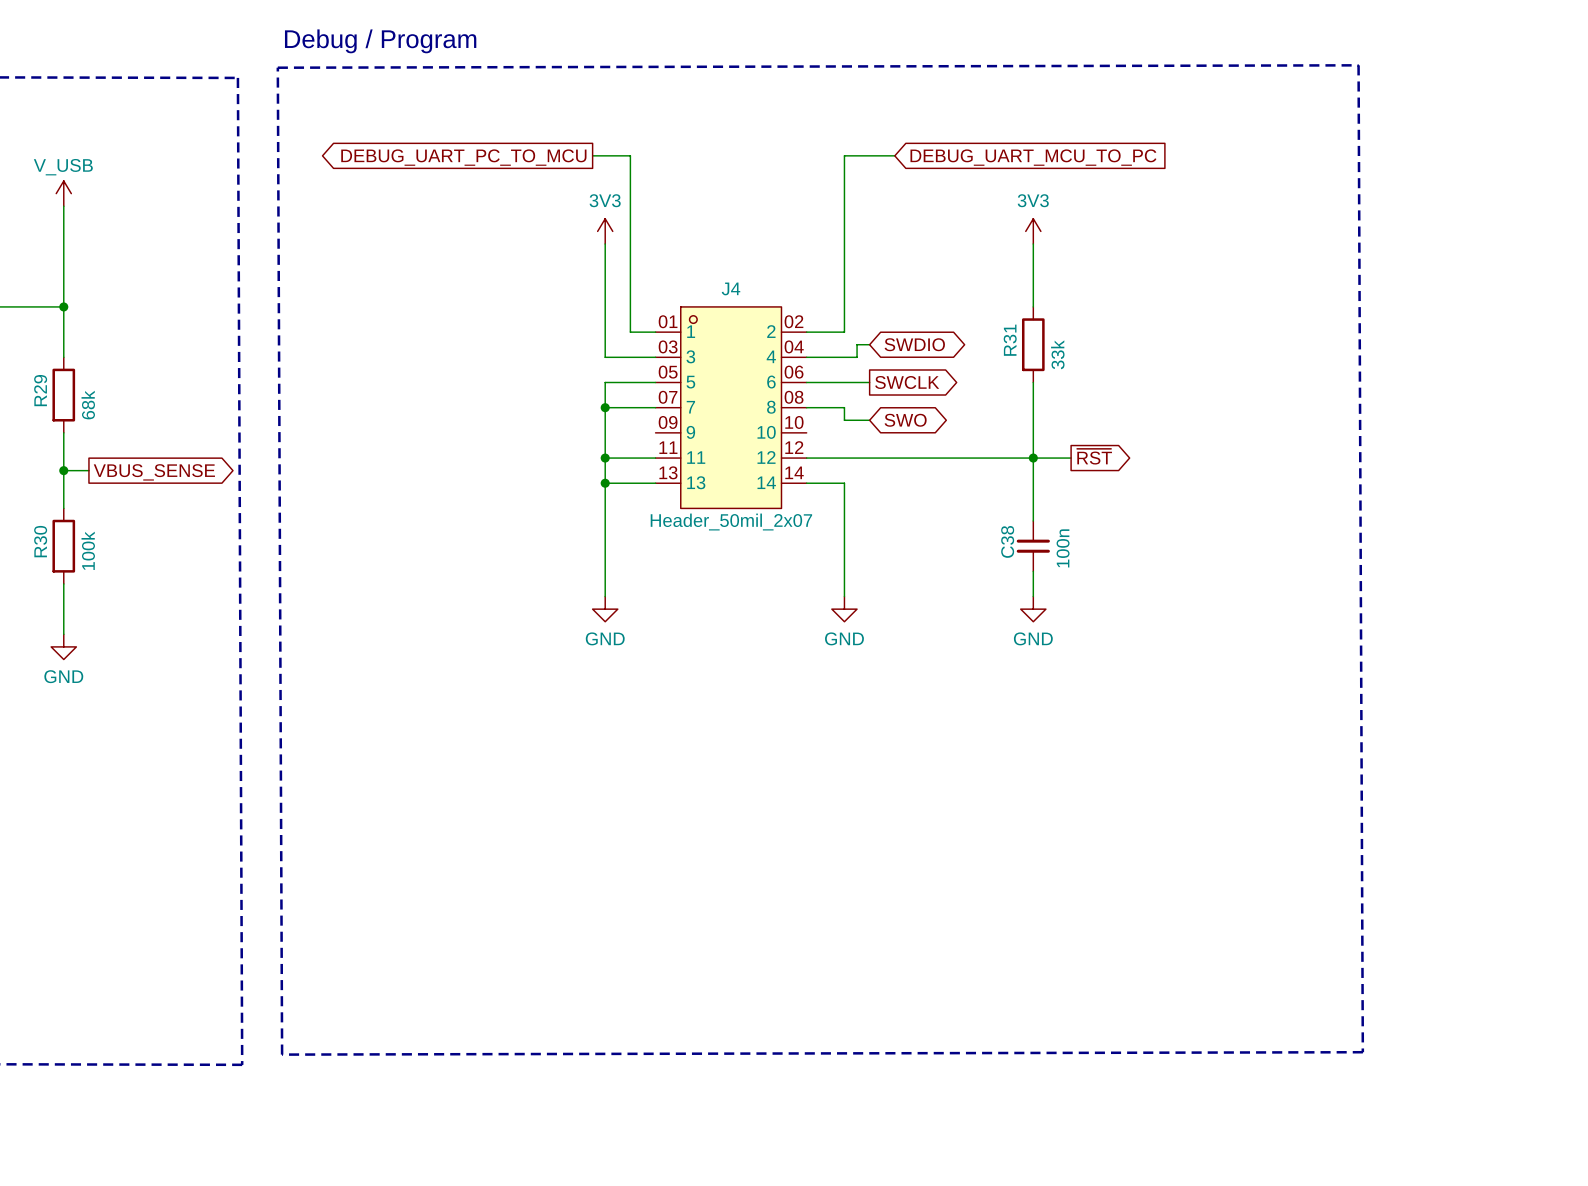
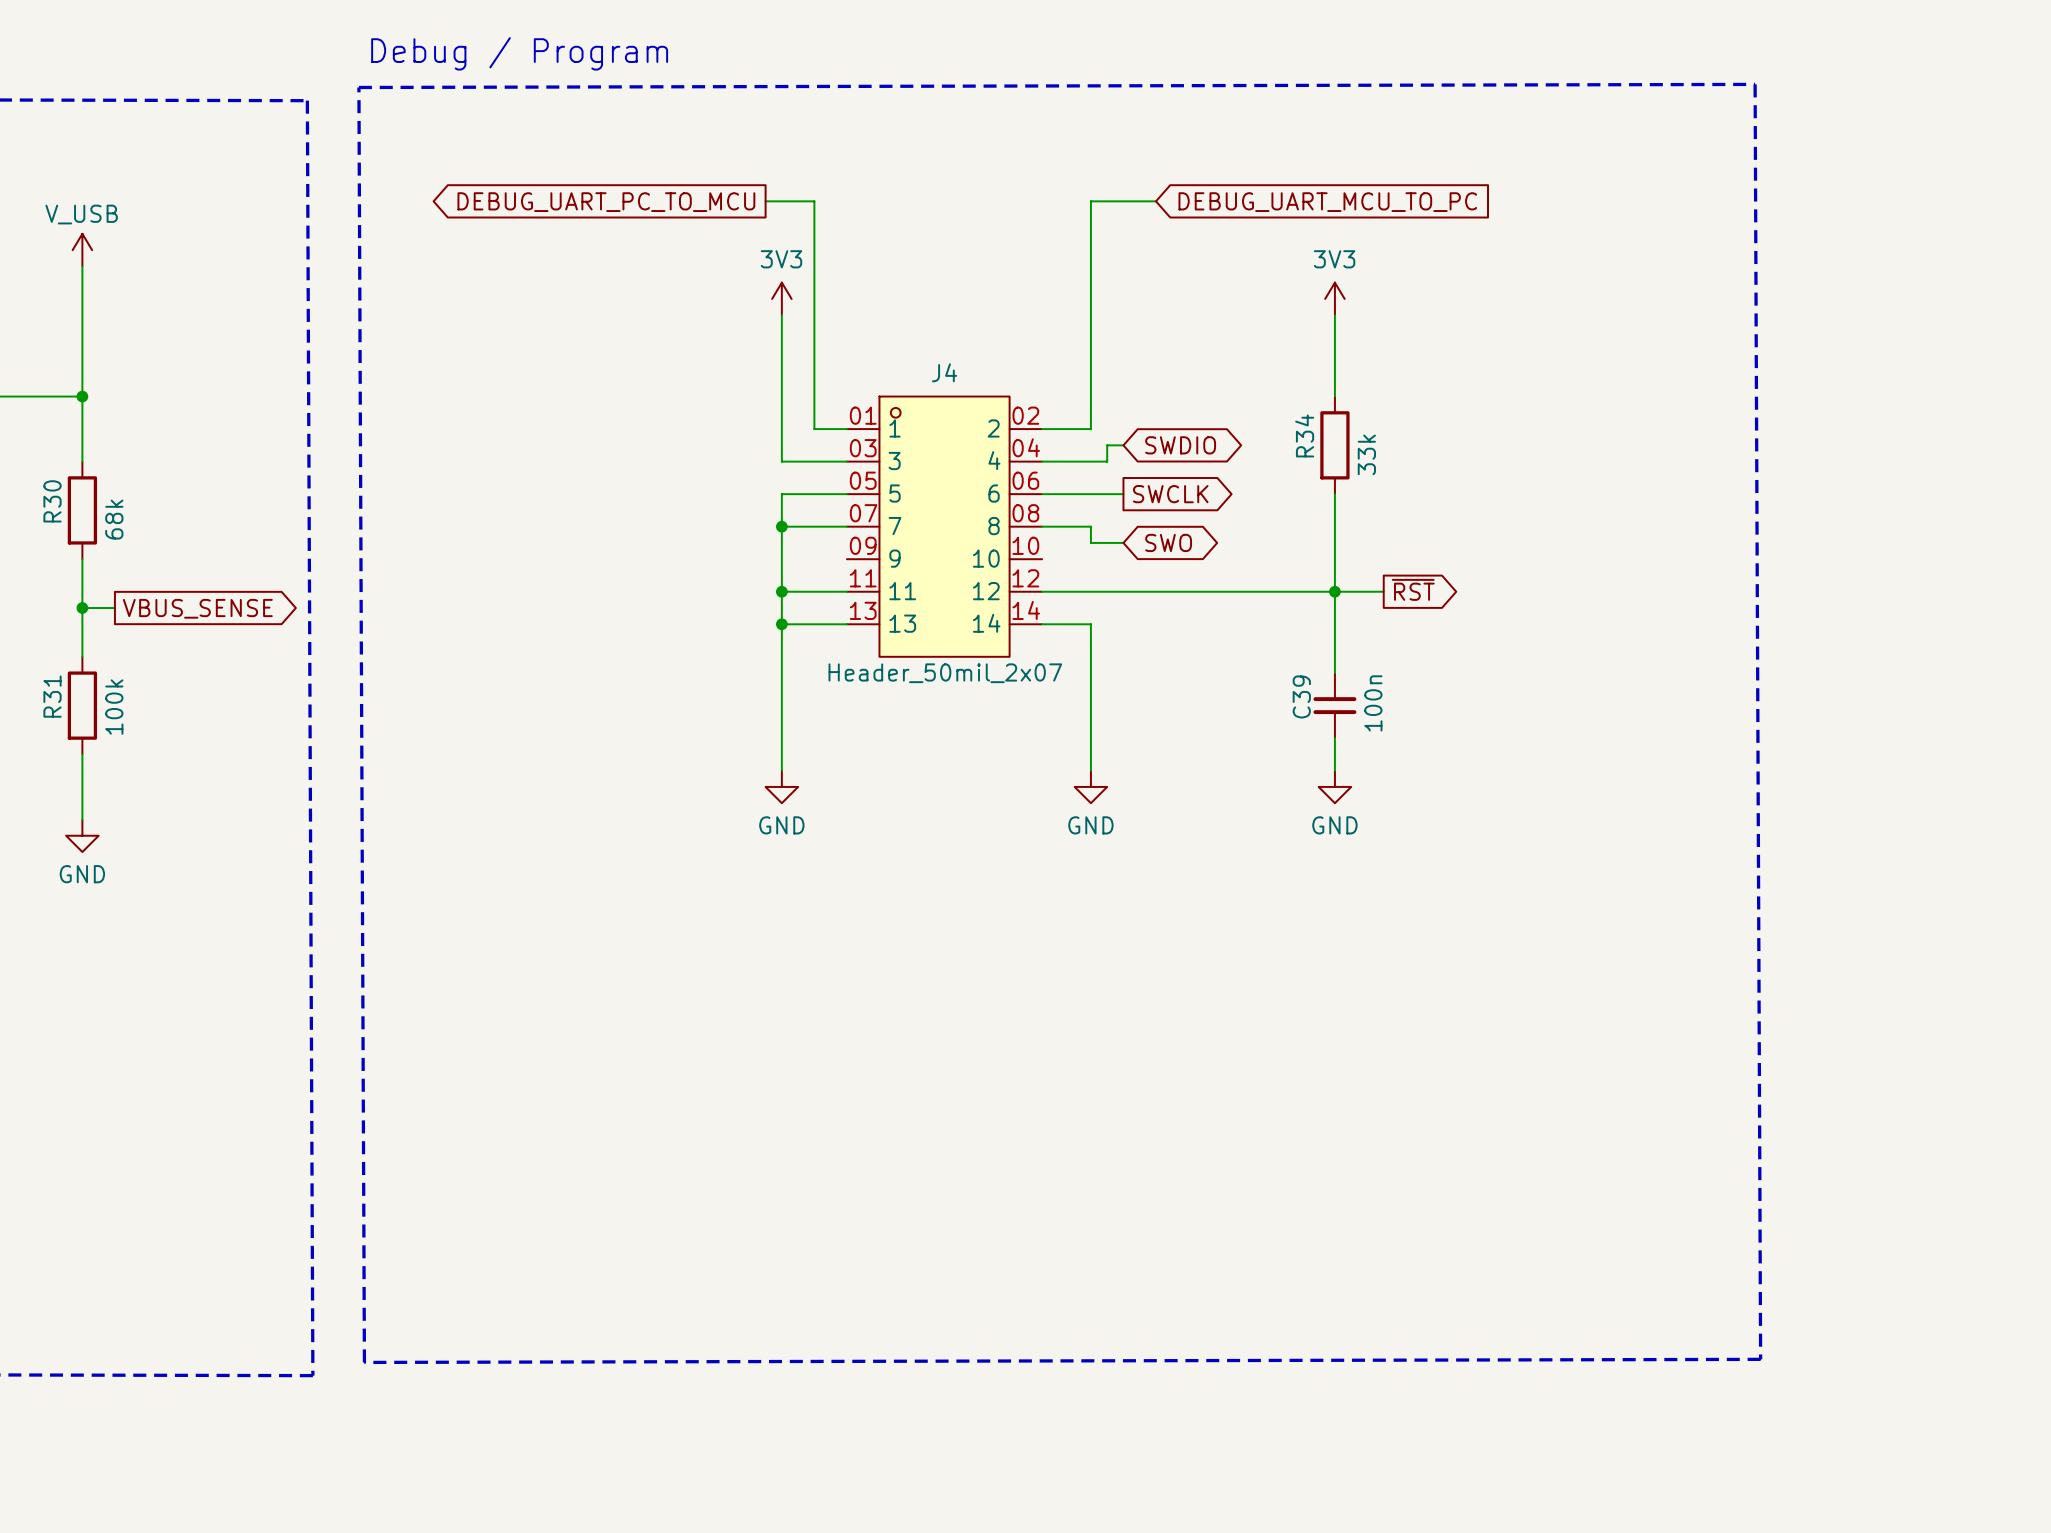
R31 name: R31 (1010, 340) -> R34 (1304, 435)
R29 name: R29 (40, 390) -> R30 (52, 501)
R30 name: R30 (40, 541) -> R31 (52, 696)
C38 name: C38 (1007, 541) -> C39 (1301, 696)

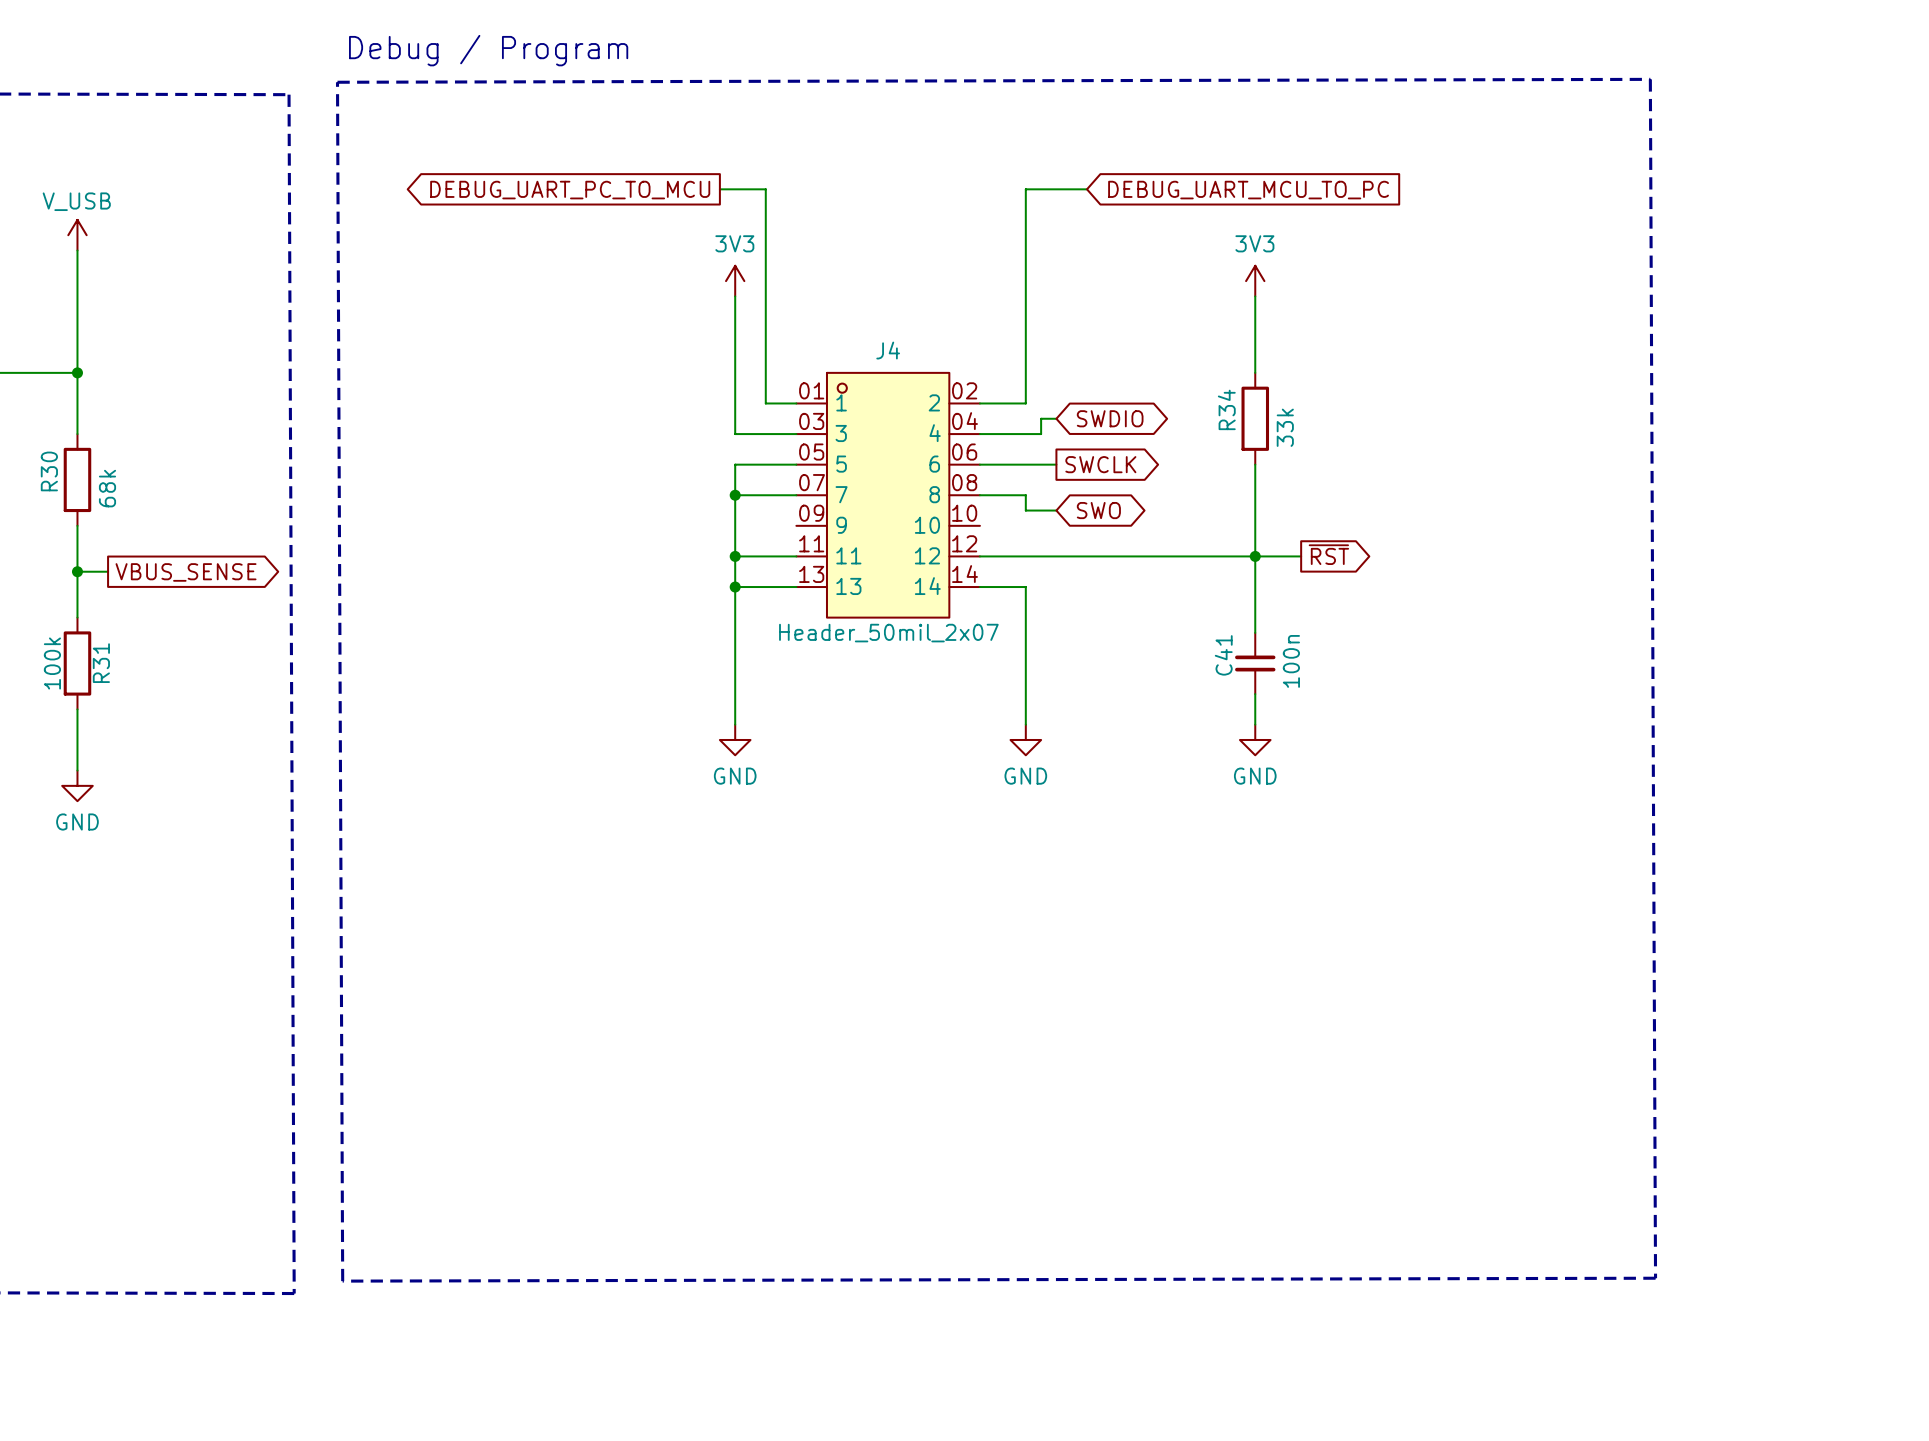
R31 name position: R31 (52, 696) -> R31 (101, 663)
C39 name: C39 (1301, 696) -> C41 (1223, 655)
R31 value position: 100k (114, 707) -> 100k (52, 663)

